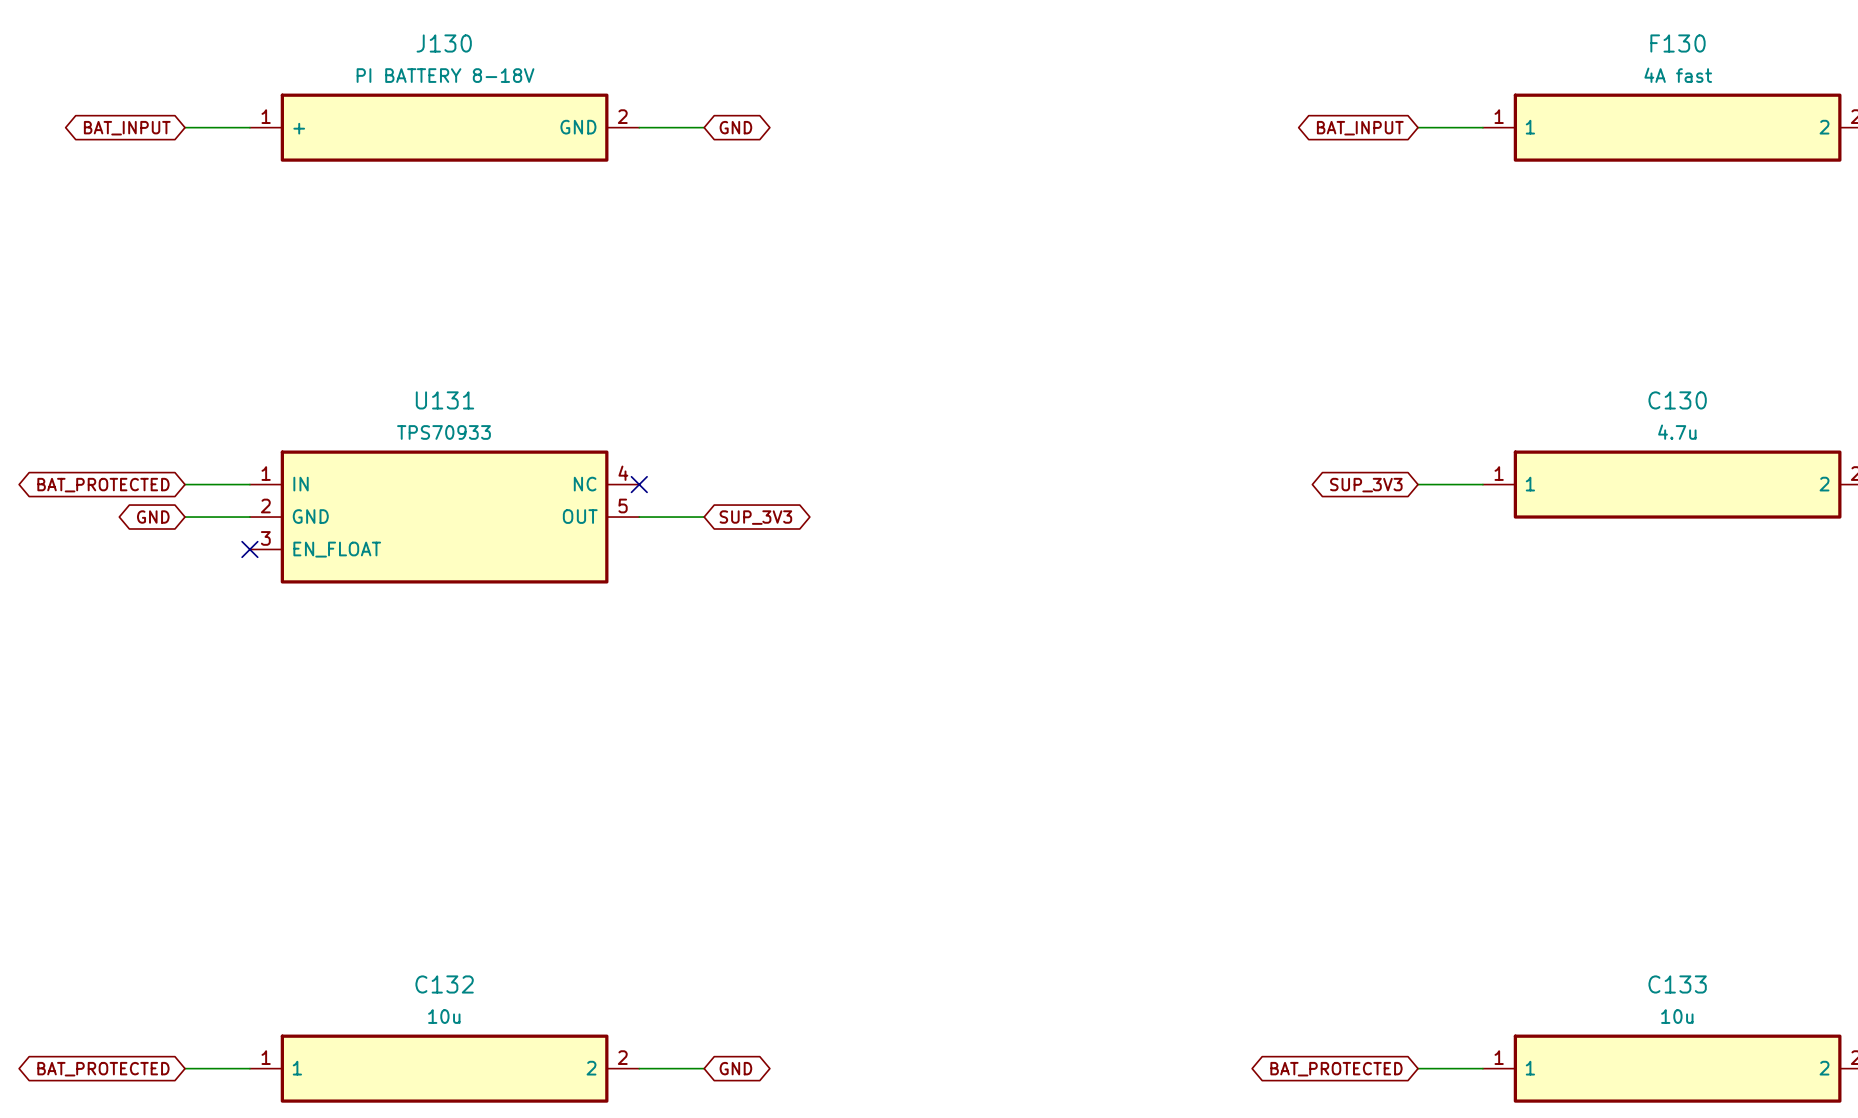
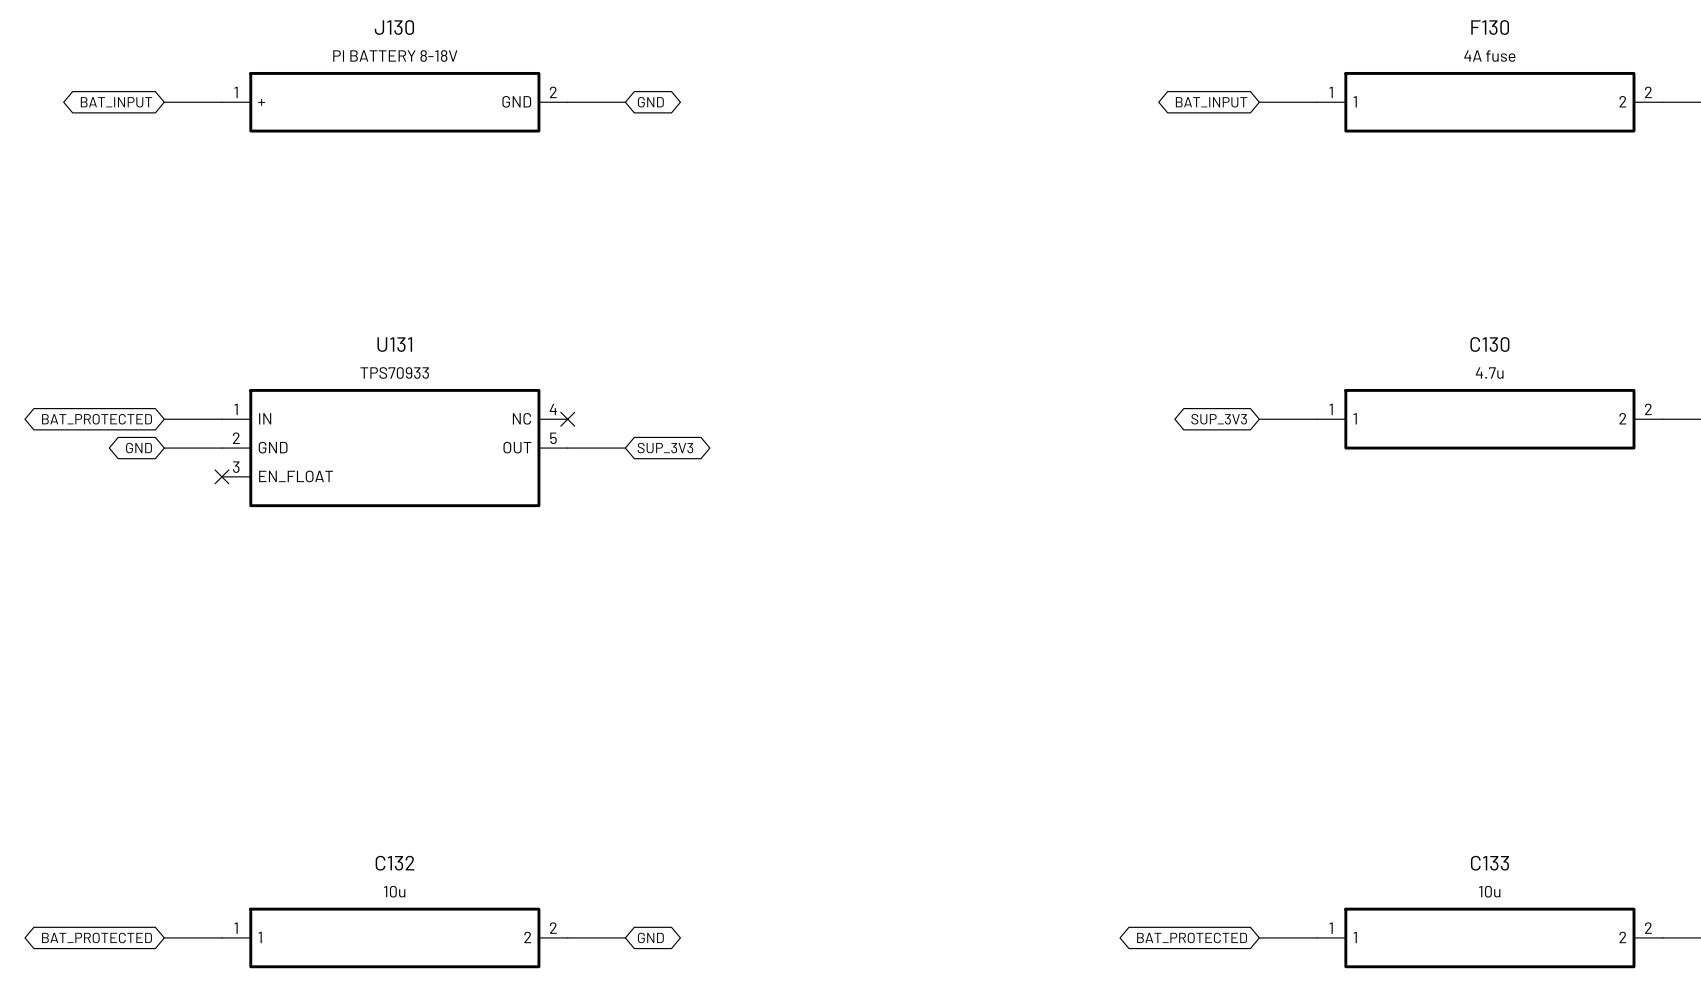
F130 value: 4A fast (1678, 75) -> 4A fuse (1489, 56)

